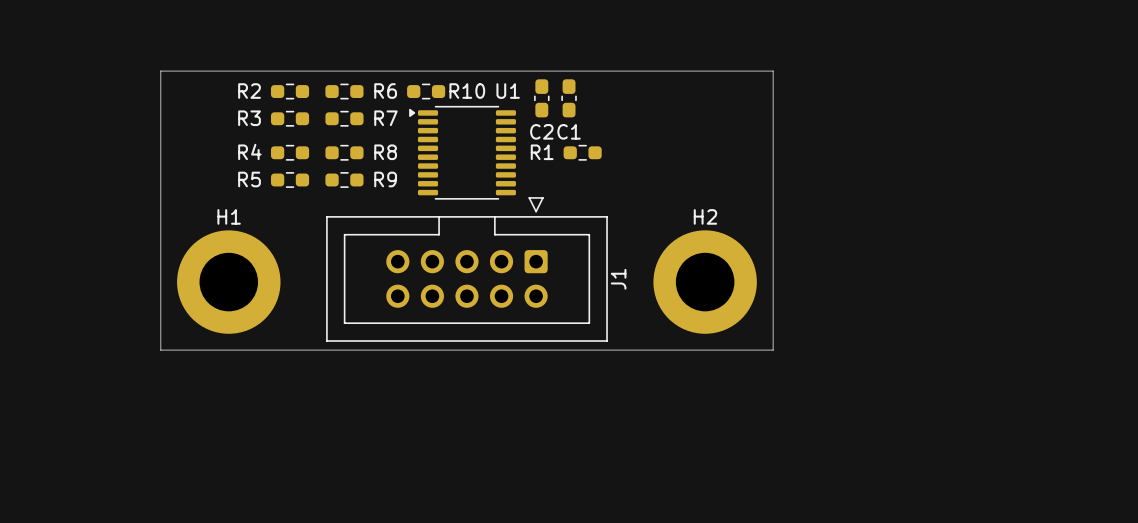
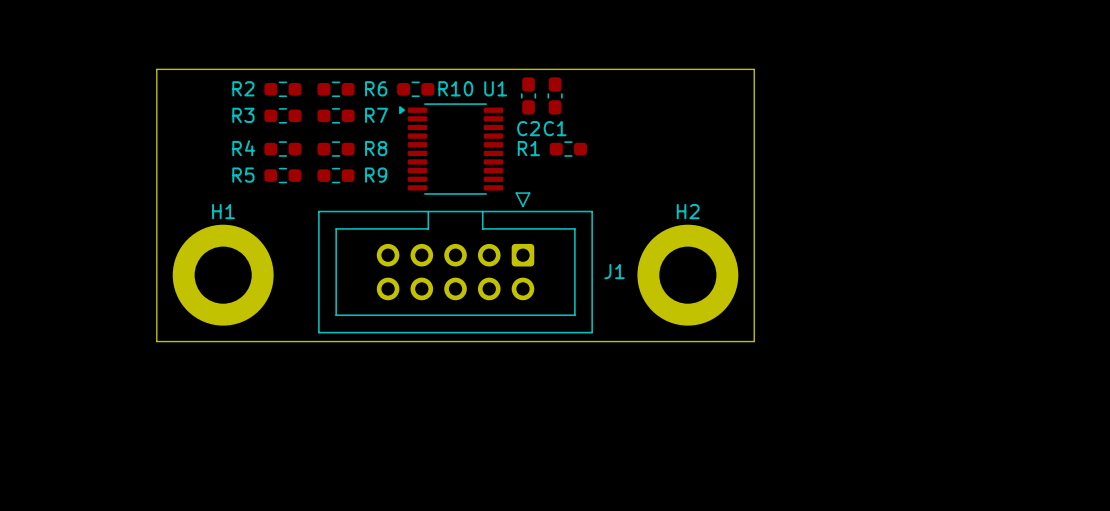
J1 name rotation: 0° (618, 279) -> 90° clockwise (614, 271)

